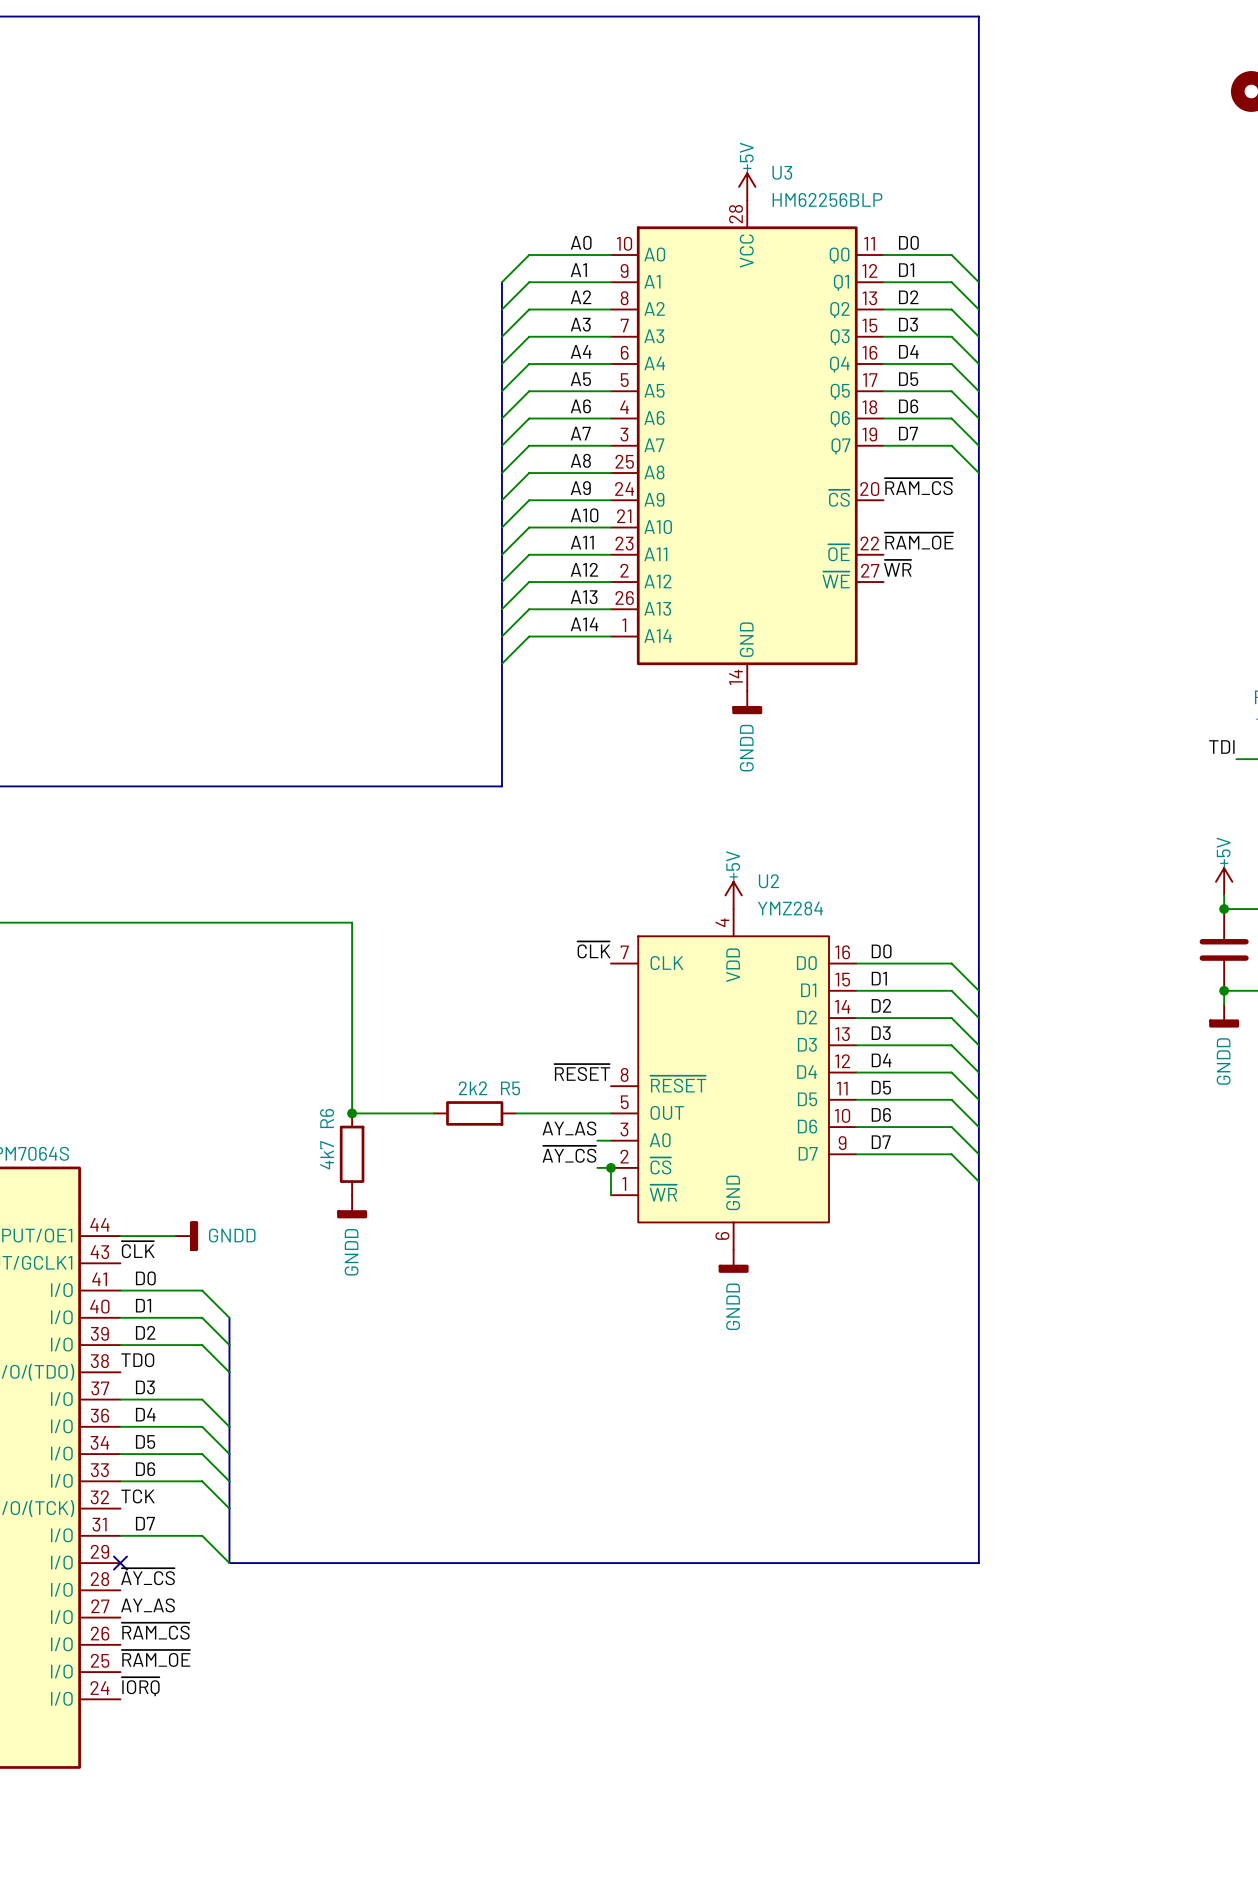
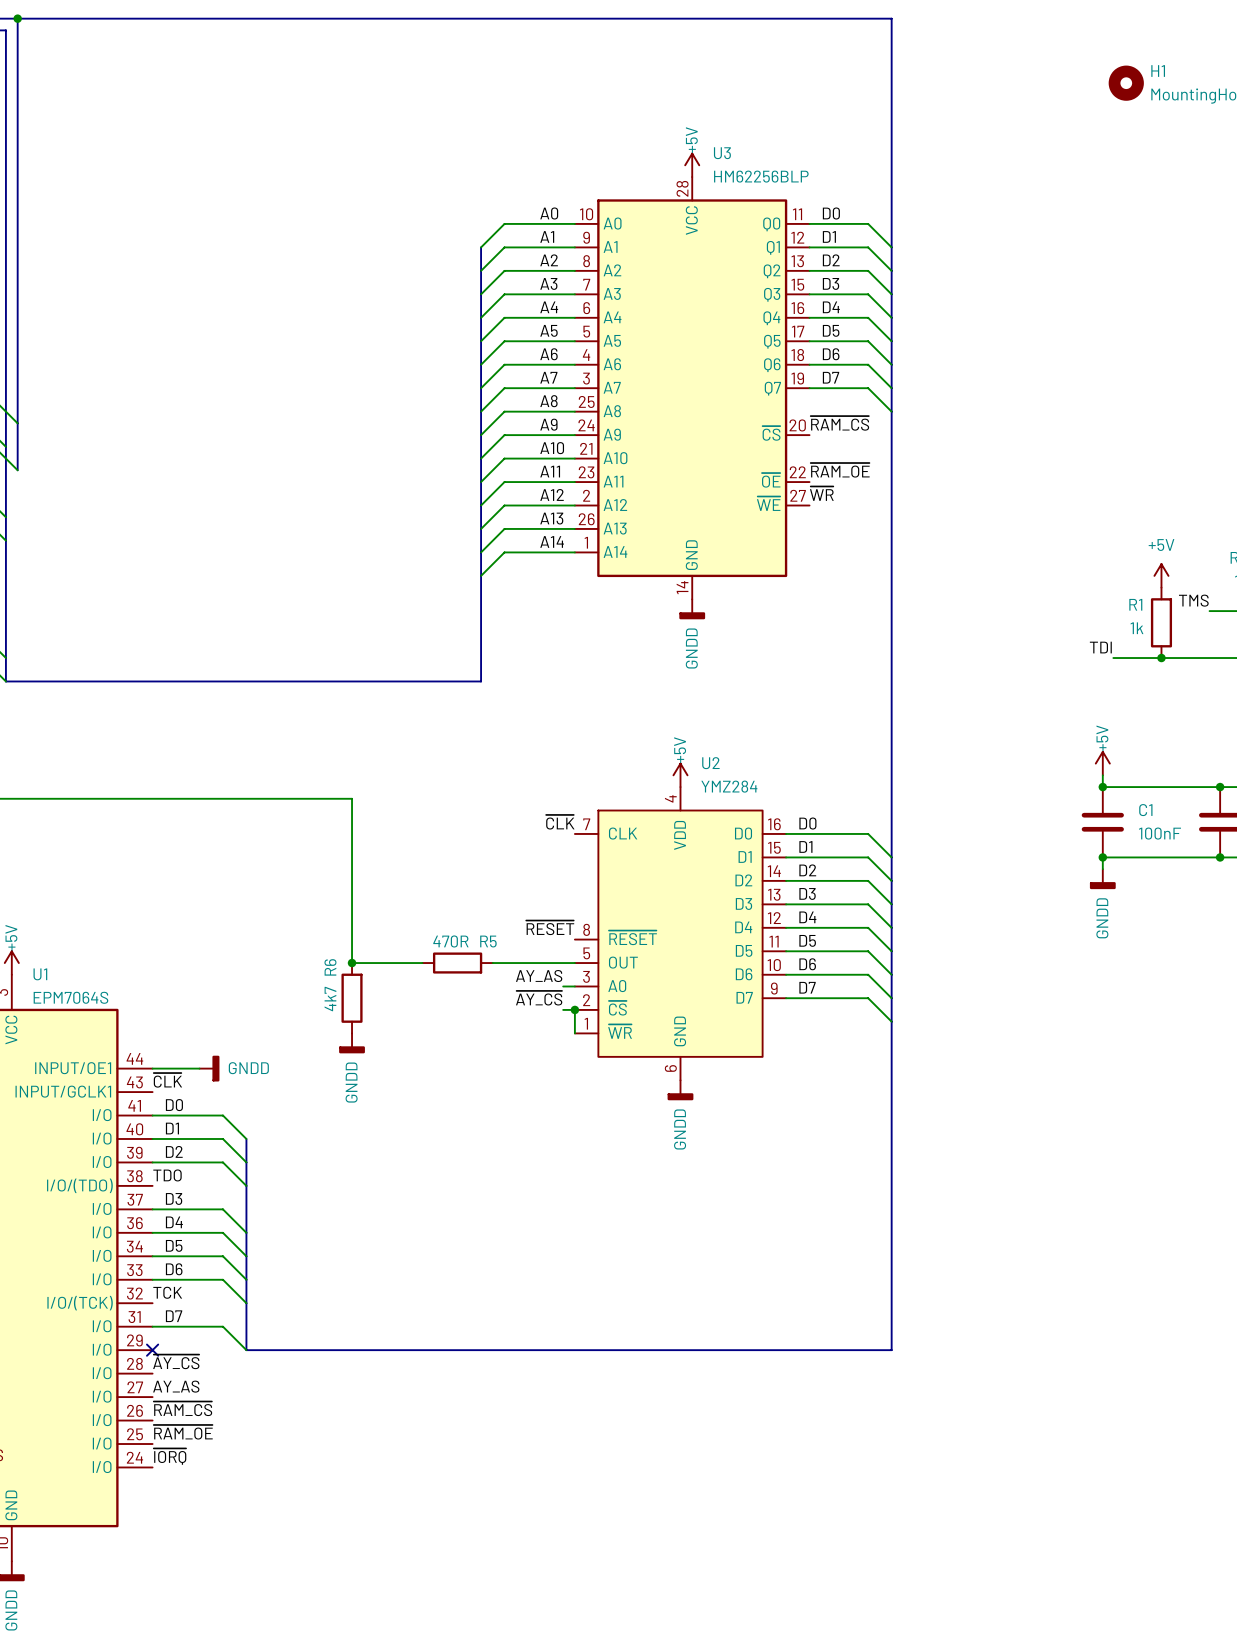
R5 value: 2k2 (473, 1088) -> 470R (450, 941)

